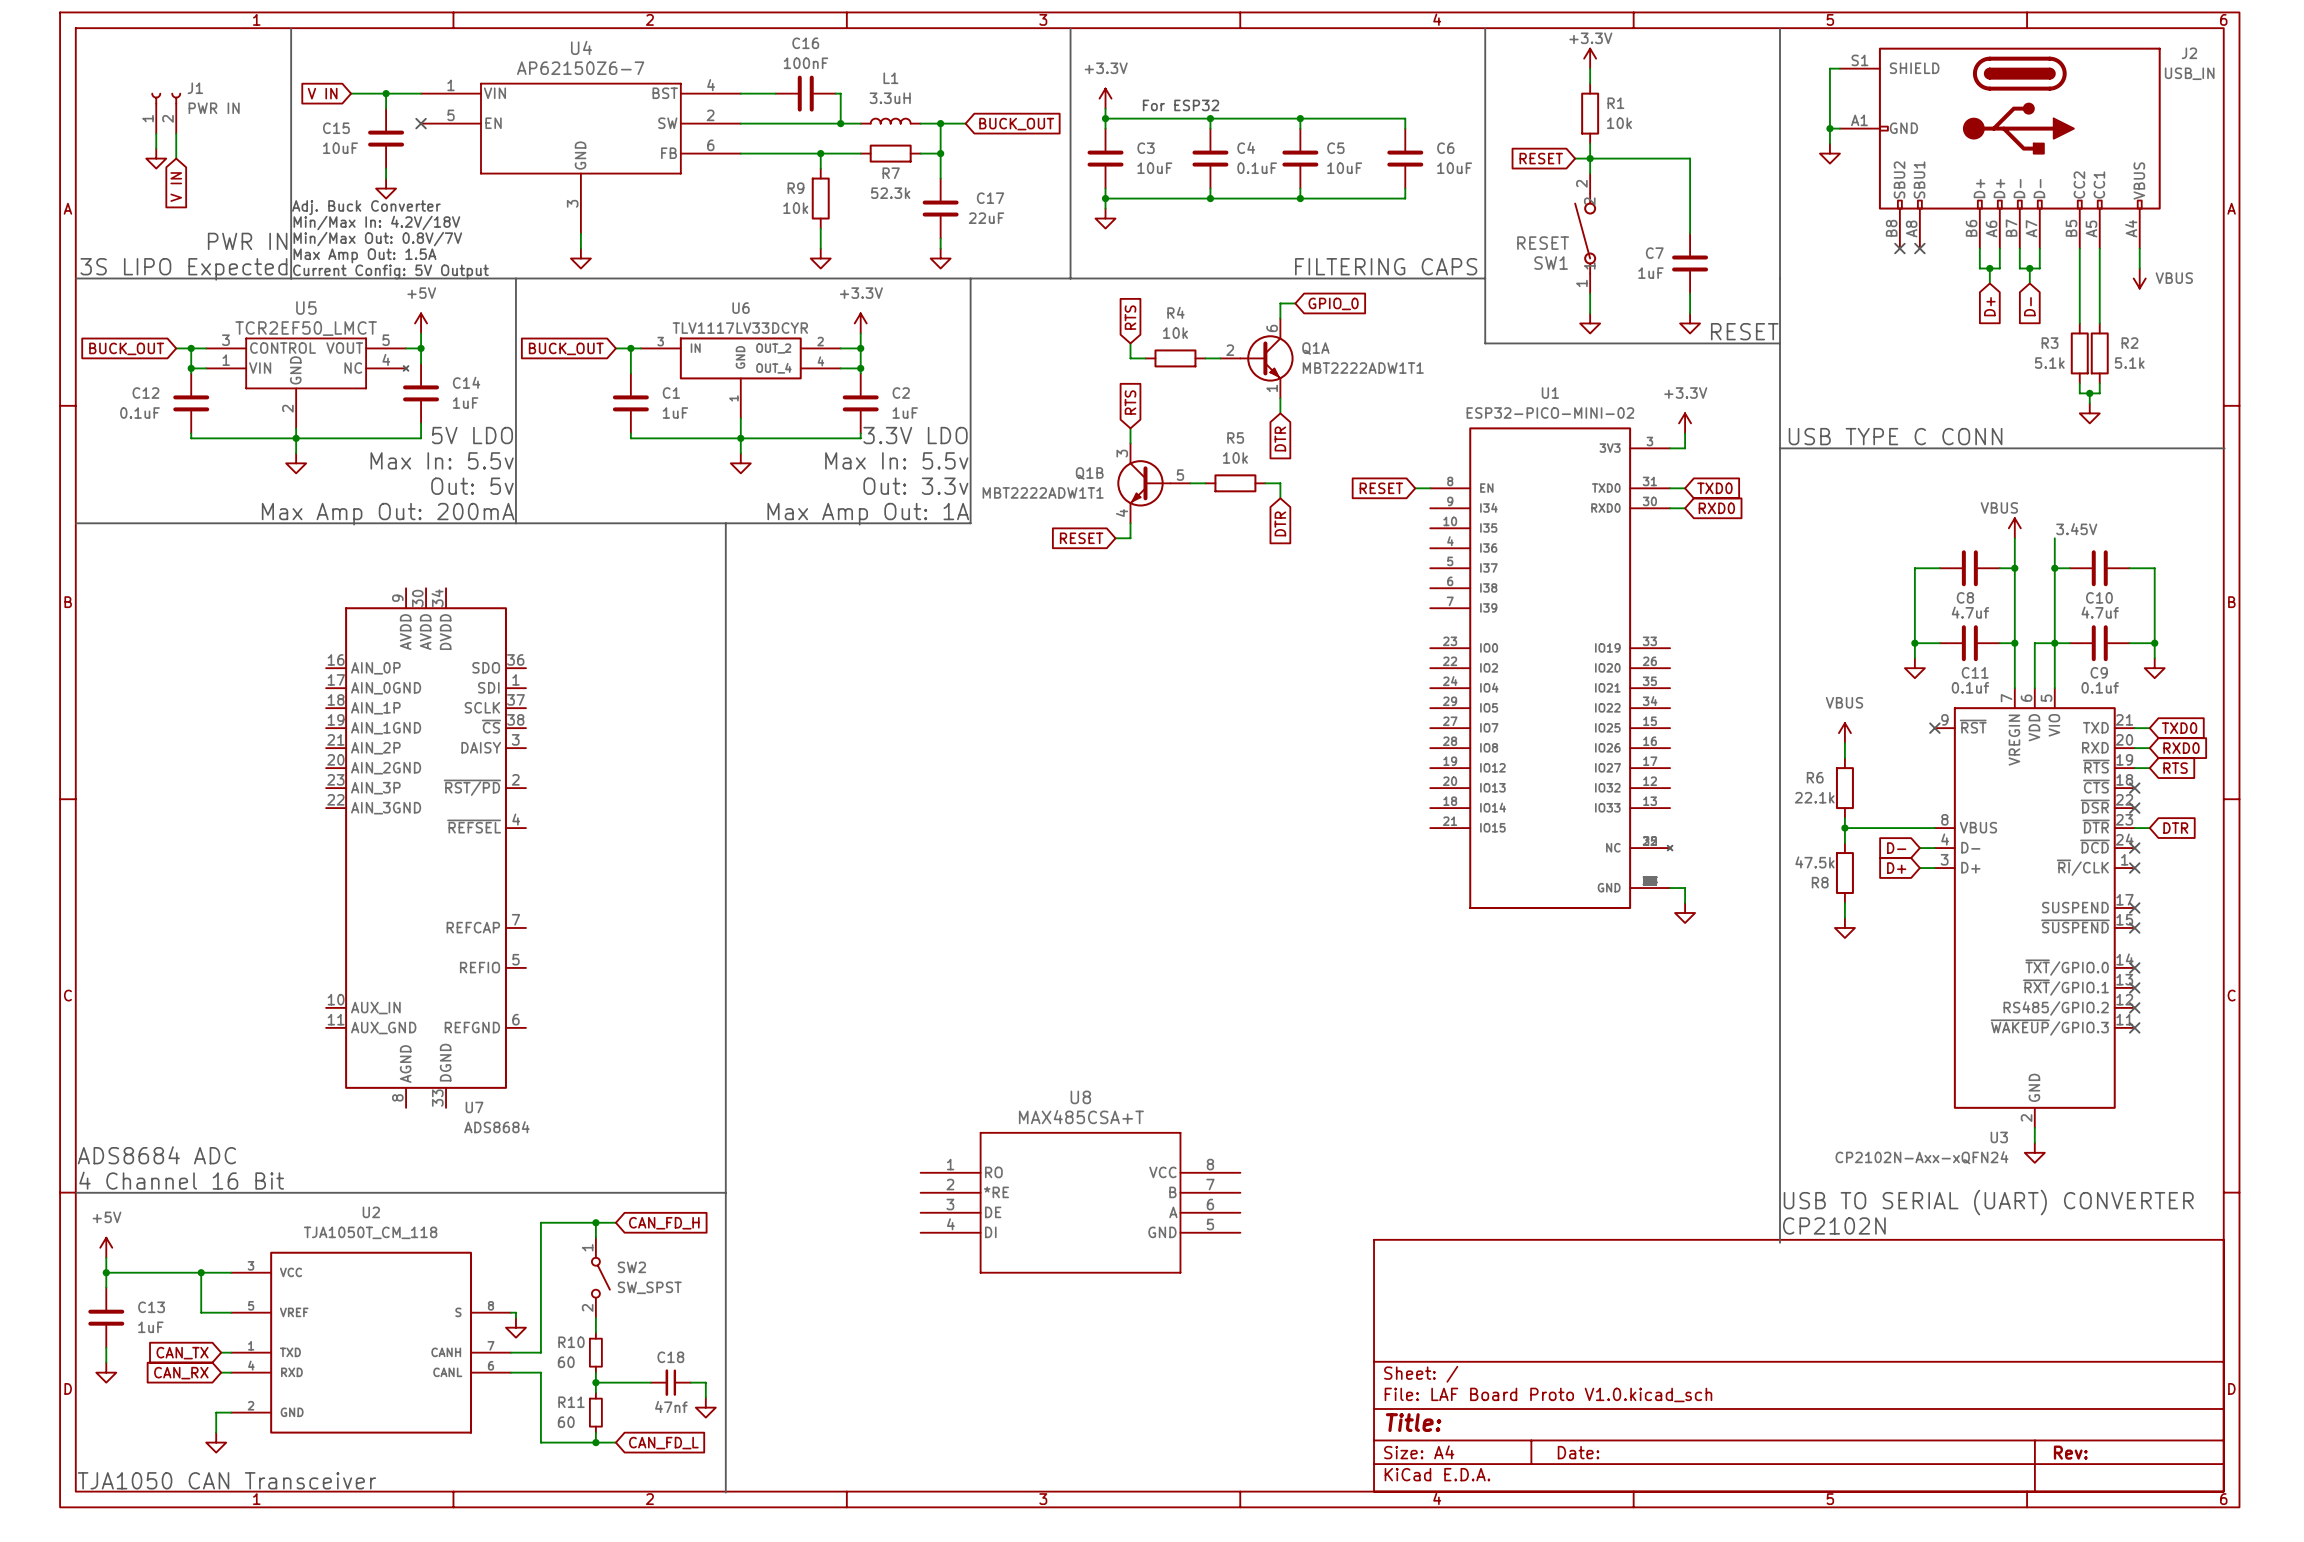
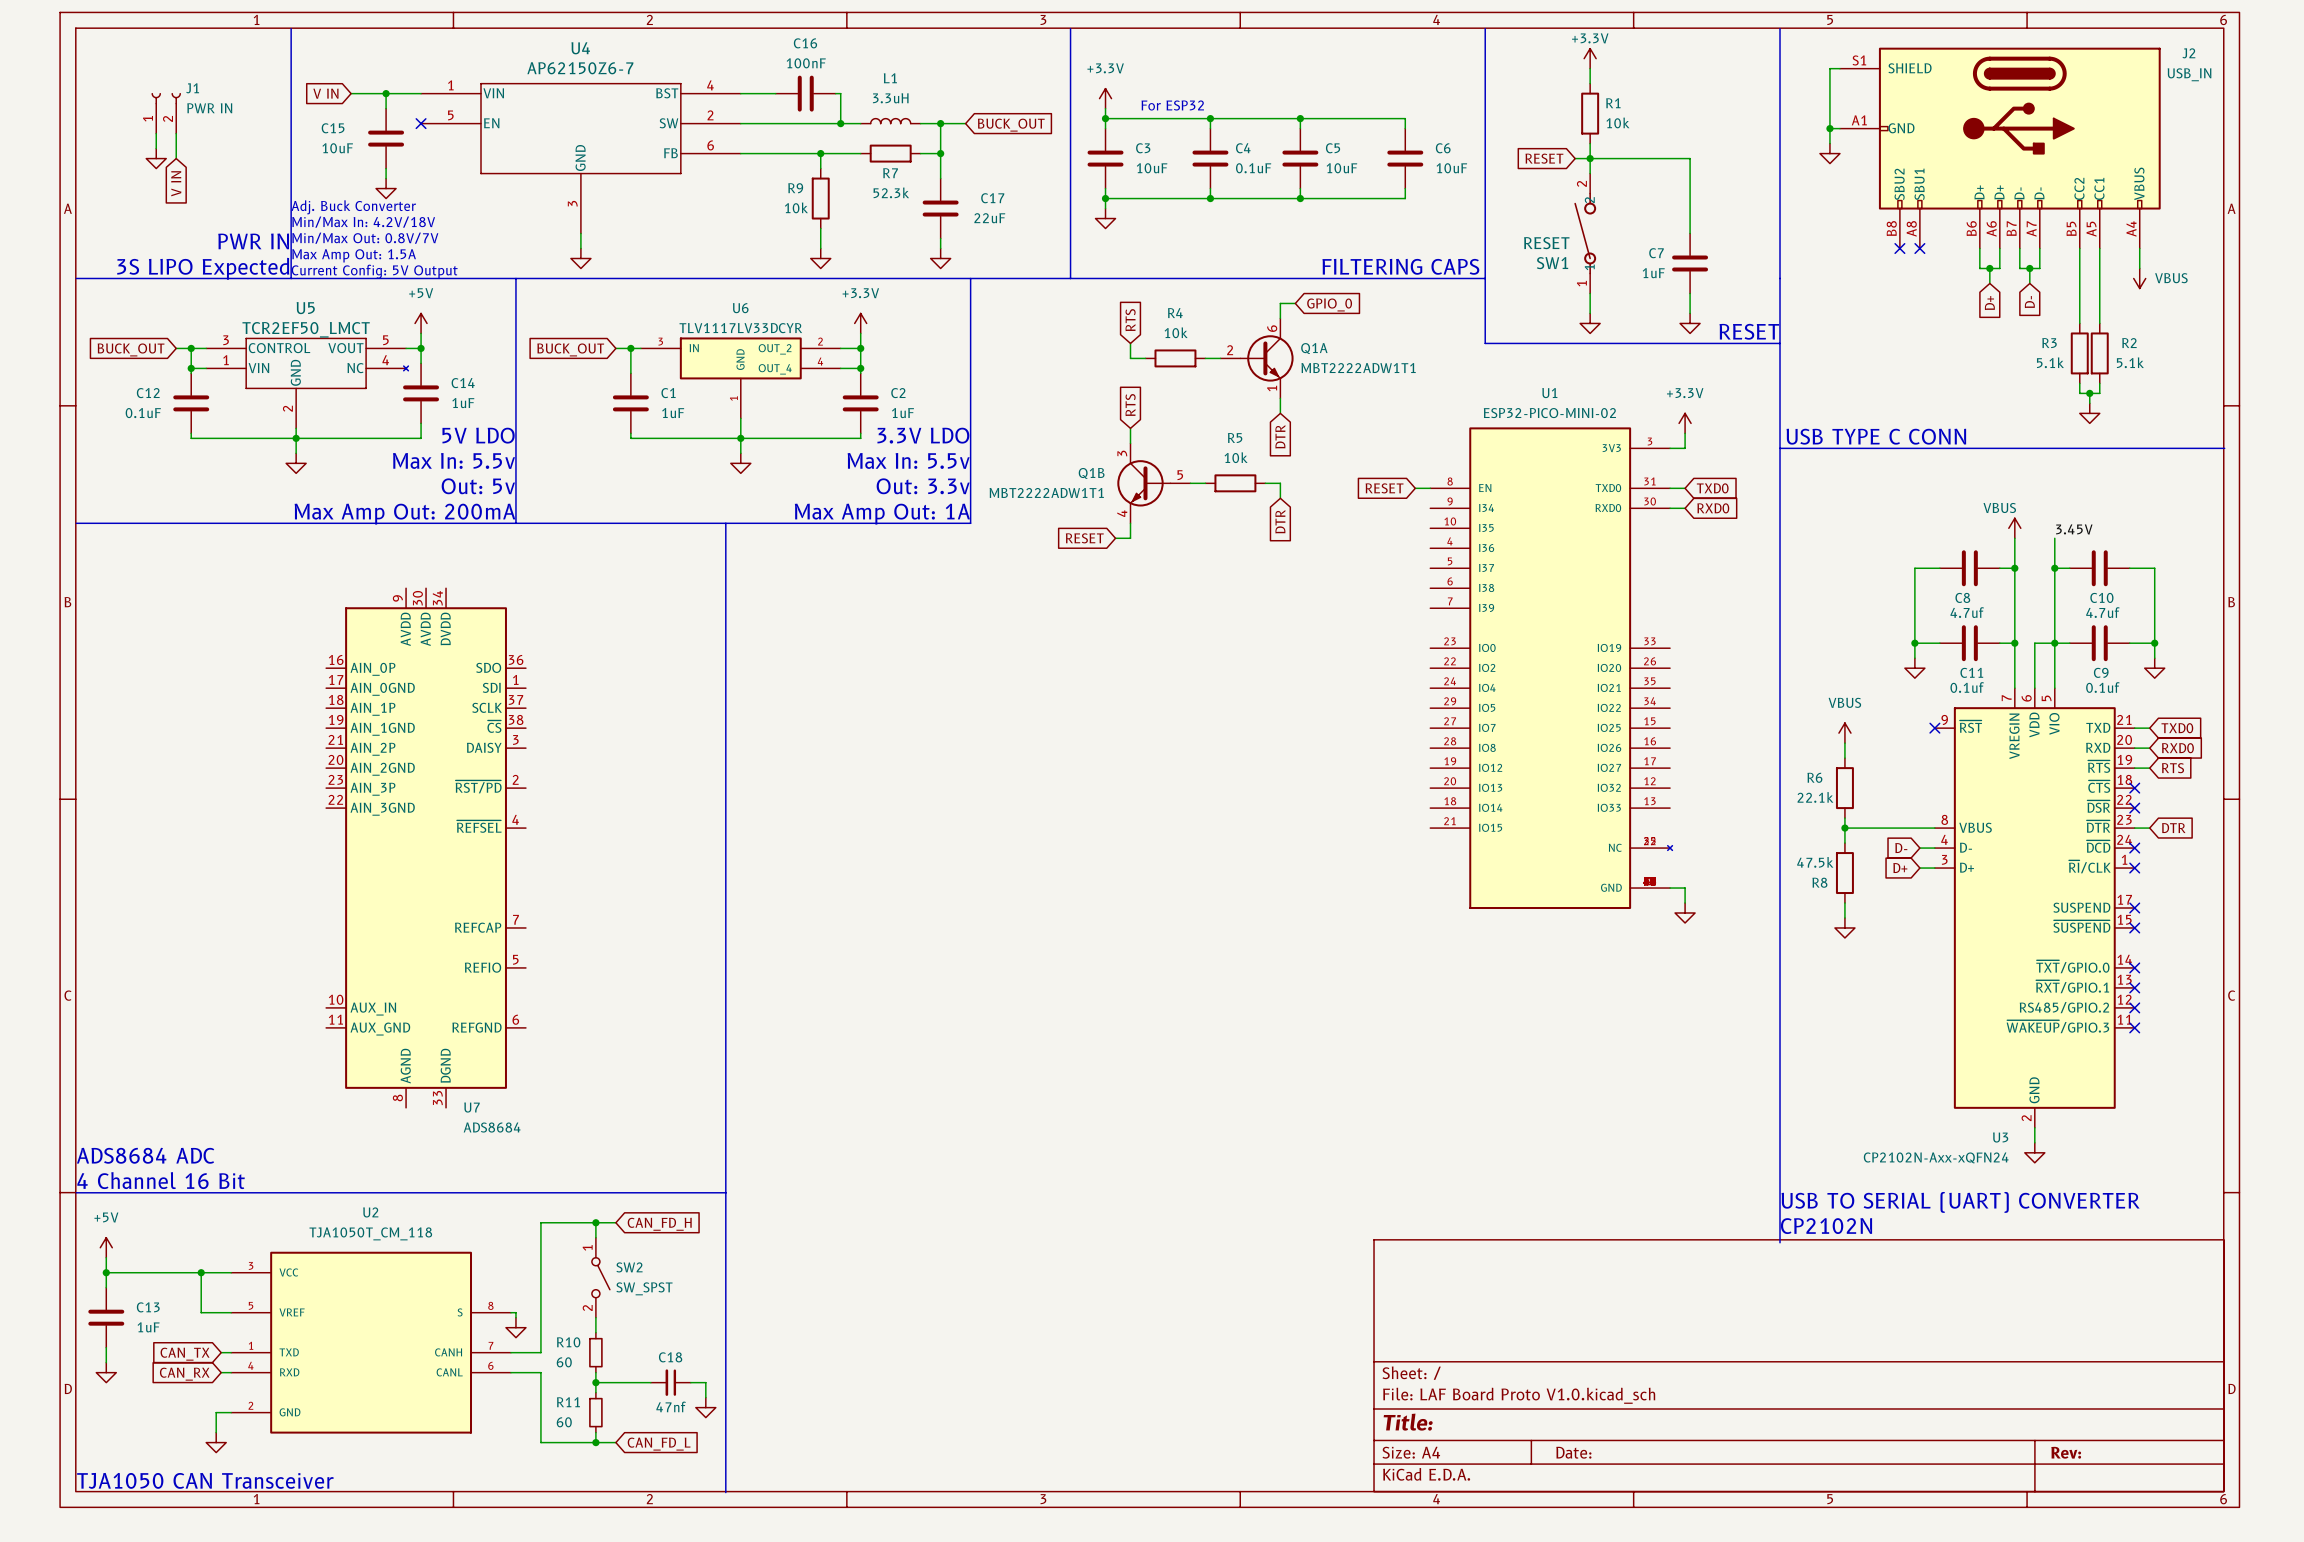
U8: MAX485CSA+T (1080, 1202) -> none

